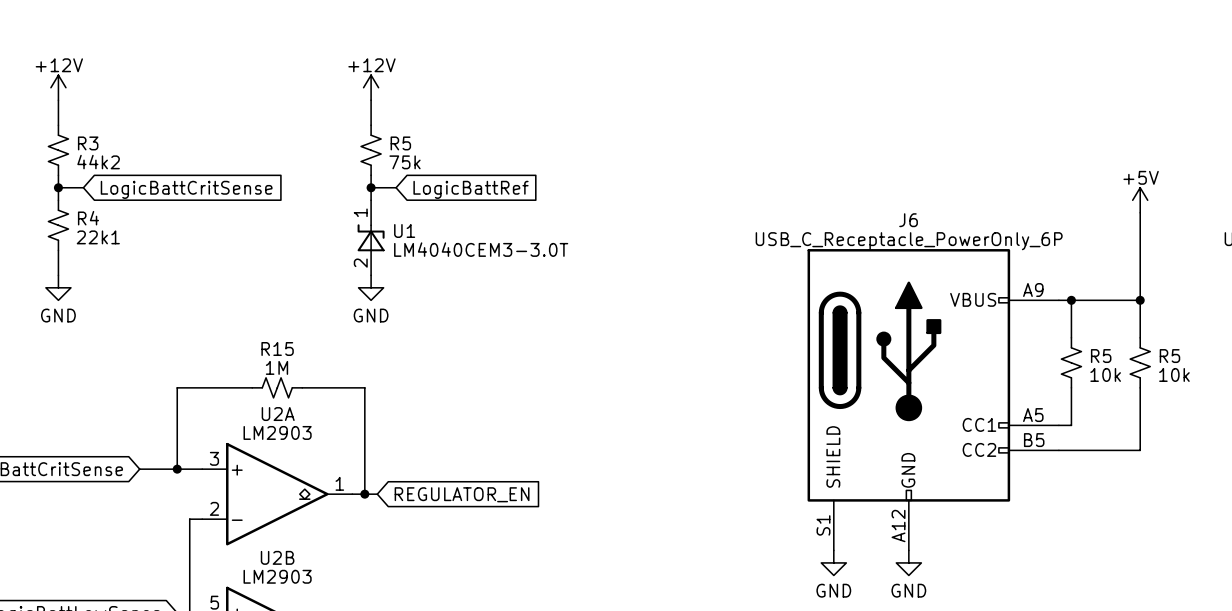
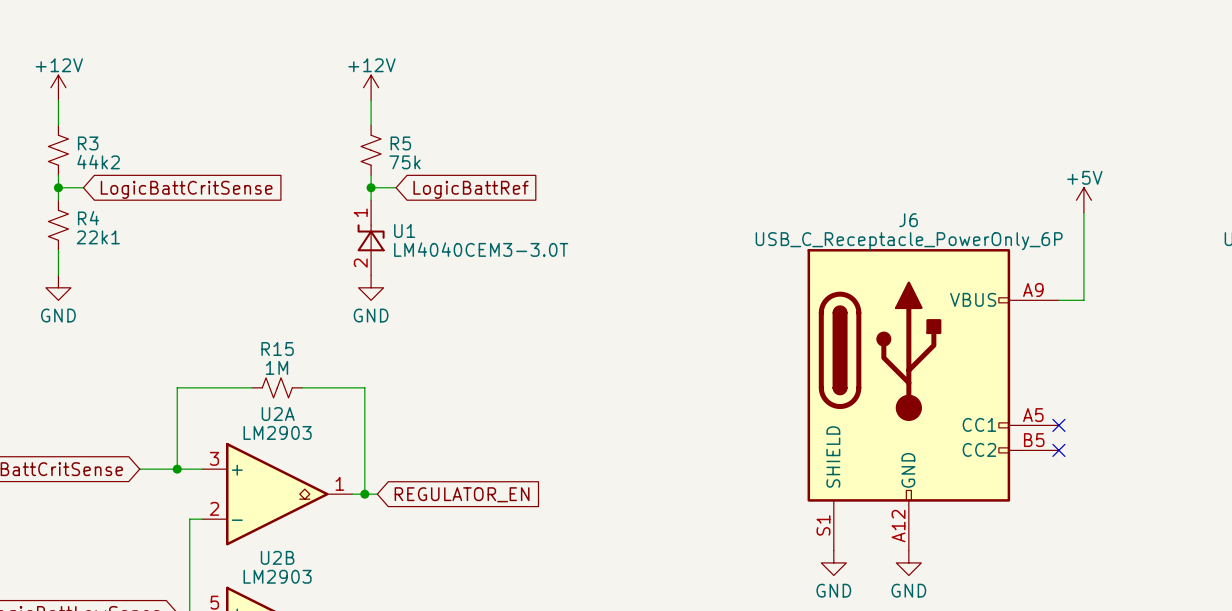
power symbol position: +5V (1140, 200) -> +5V (1083, 200)
wire: (1140, 212) (1140, 337) -> none
wire: (1071, 300) (1071, 337) -> none
junction: (1071, 300) -> none
wire: (1083, 300) (1140, 300) -> (1083, 300) (1083, 212)
junction: (1140, 300) -> none
R5: 10k (1071, 362) -> none
R5: 10k (1140, 362) -> none
wire: (1071, 387) (1071, 425) (1058, 425) -> none
wire: (1140, 387) (1140, 450) (1058, 450) -> none
no-connect mark: none -> (1058, 425)
no-connect mark: none -> (1058, 450)

